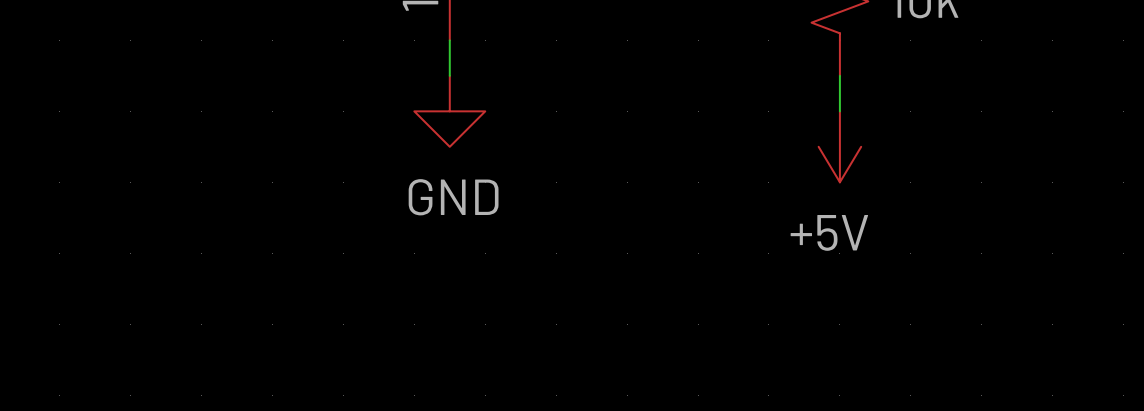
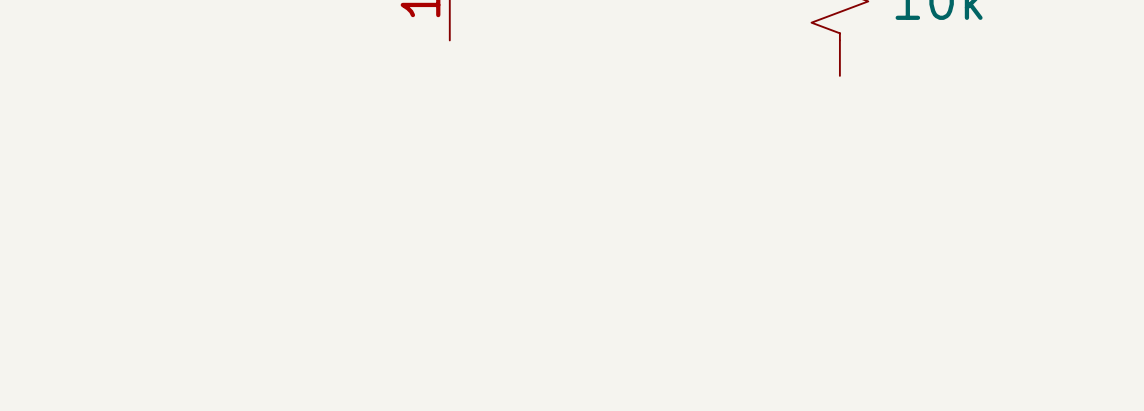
wire: (449, 40) (449, 75) -> none
wire: (839, 75) (839, 111) -> none
power symbol: GND (449, 111) -> none
power symbol: +5V (839, 146) -> none

